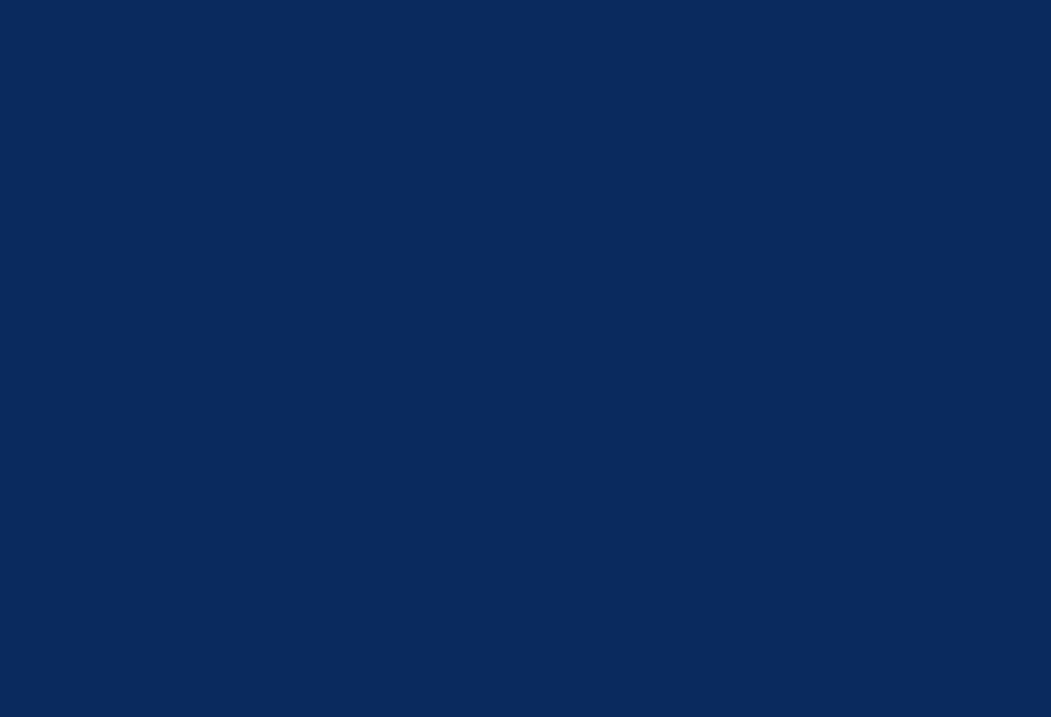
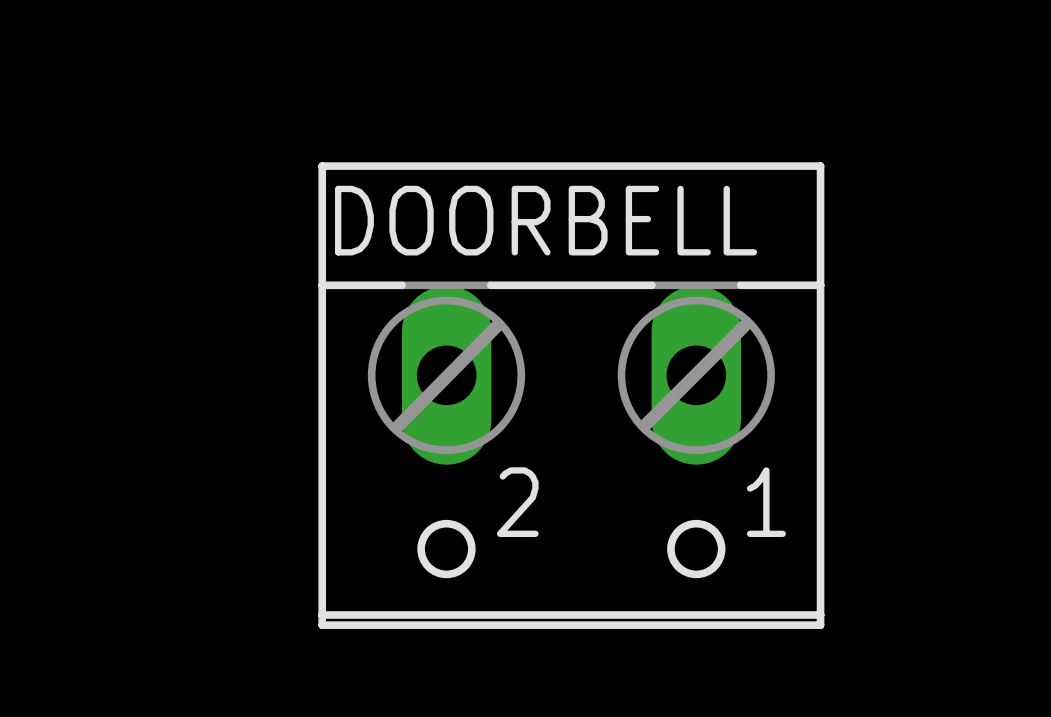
DOORBELL: none -> (571, 395)

